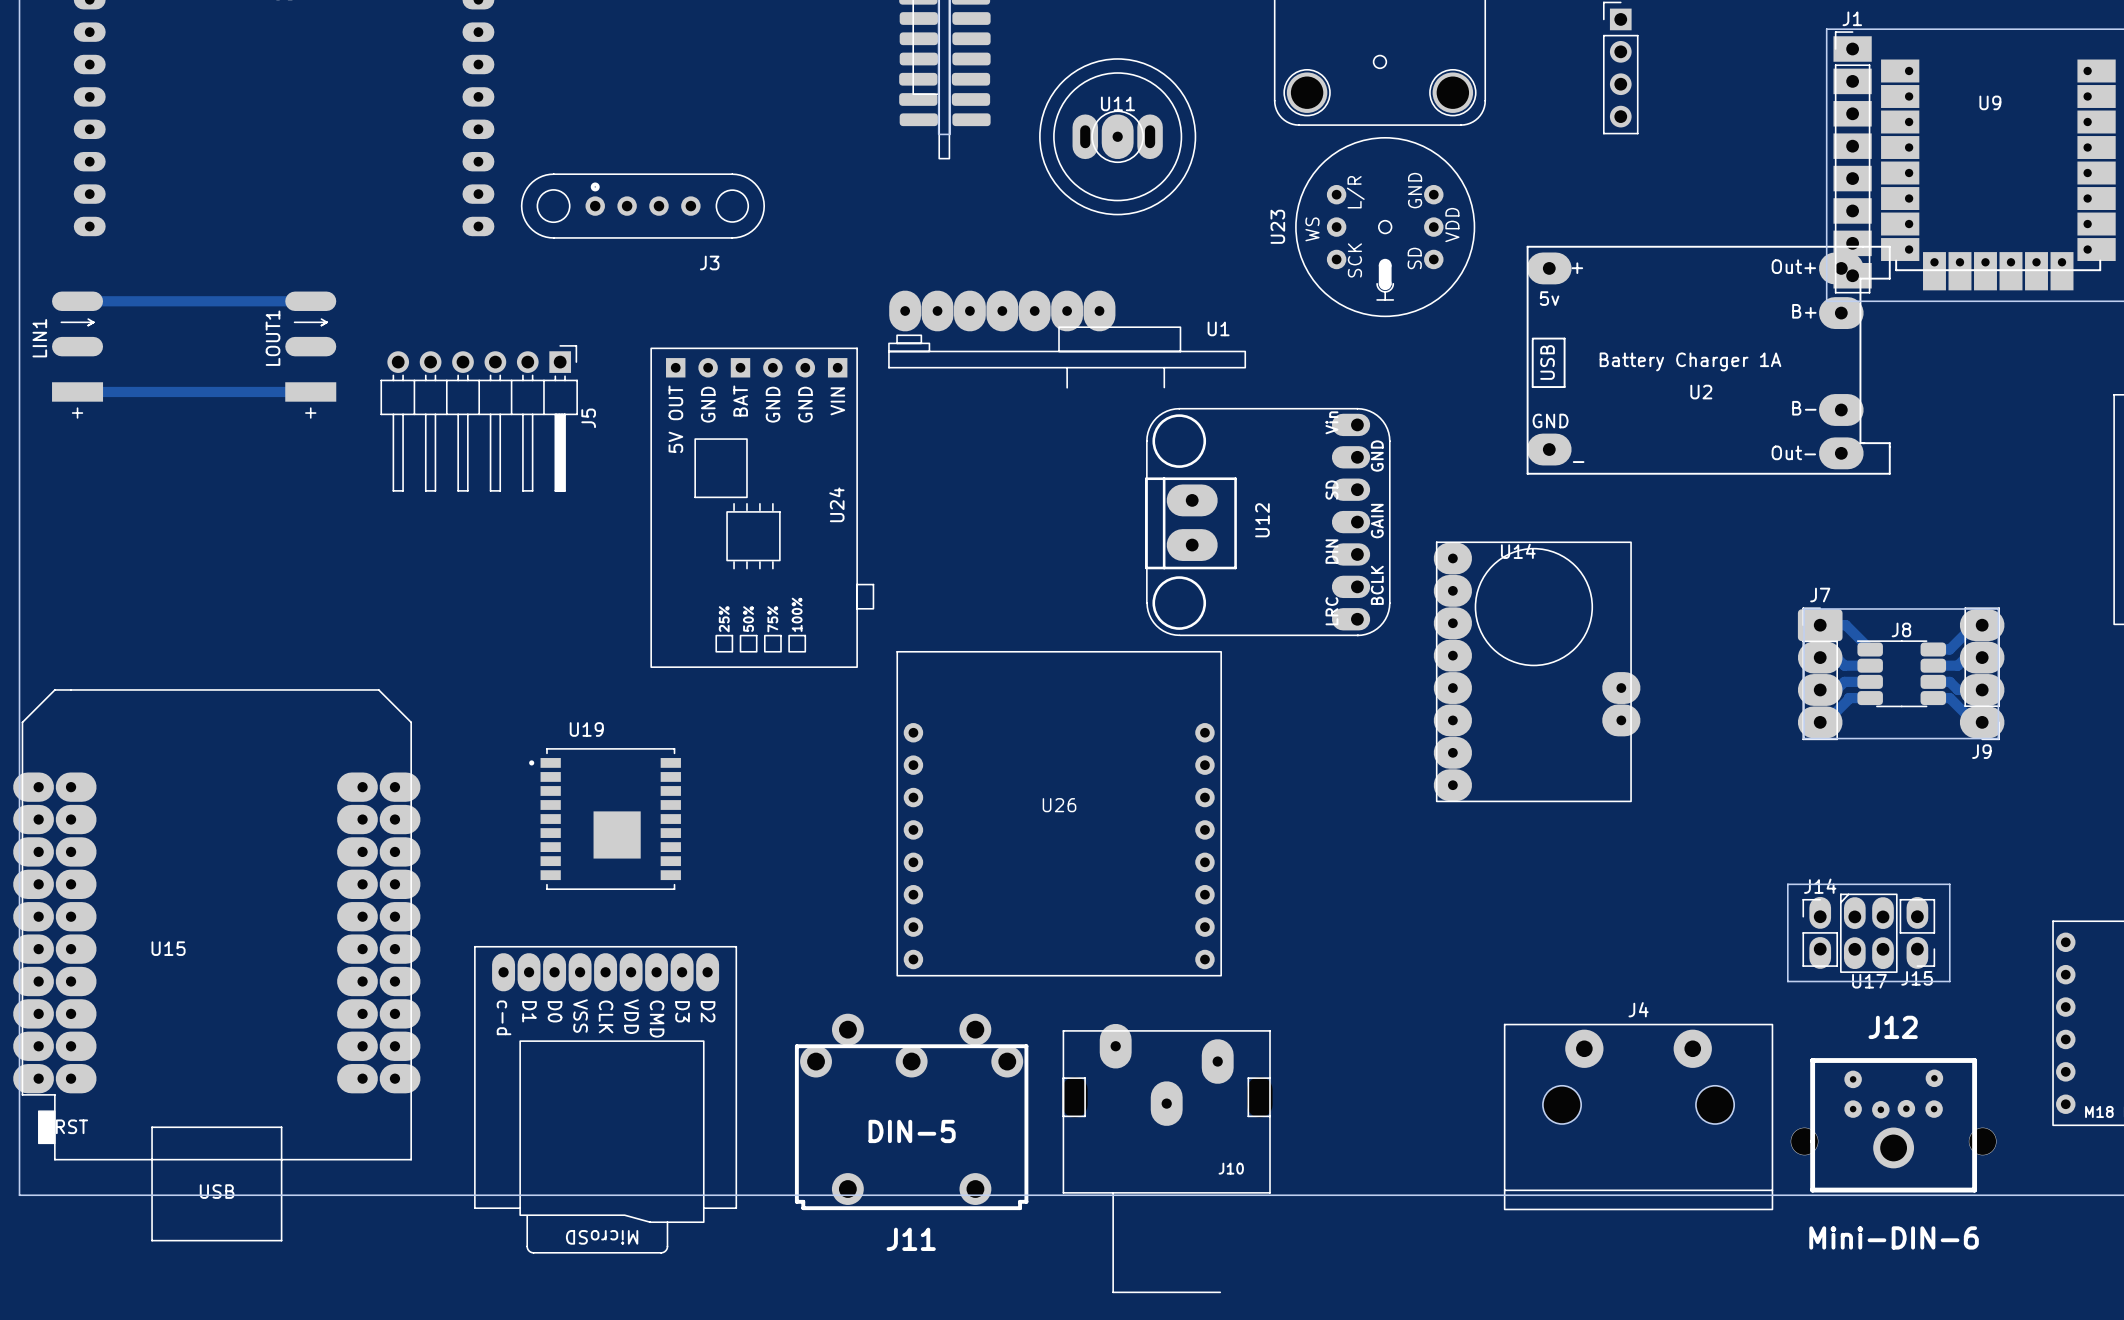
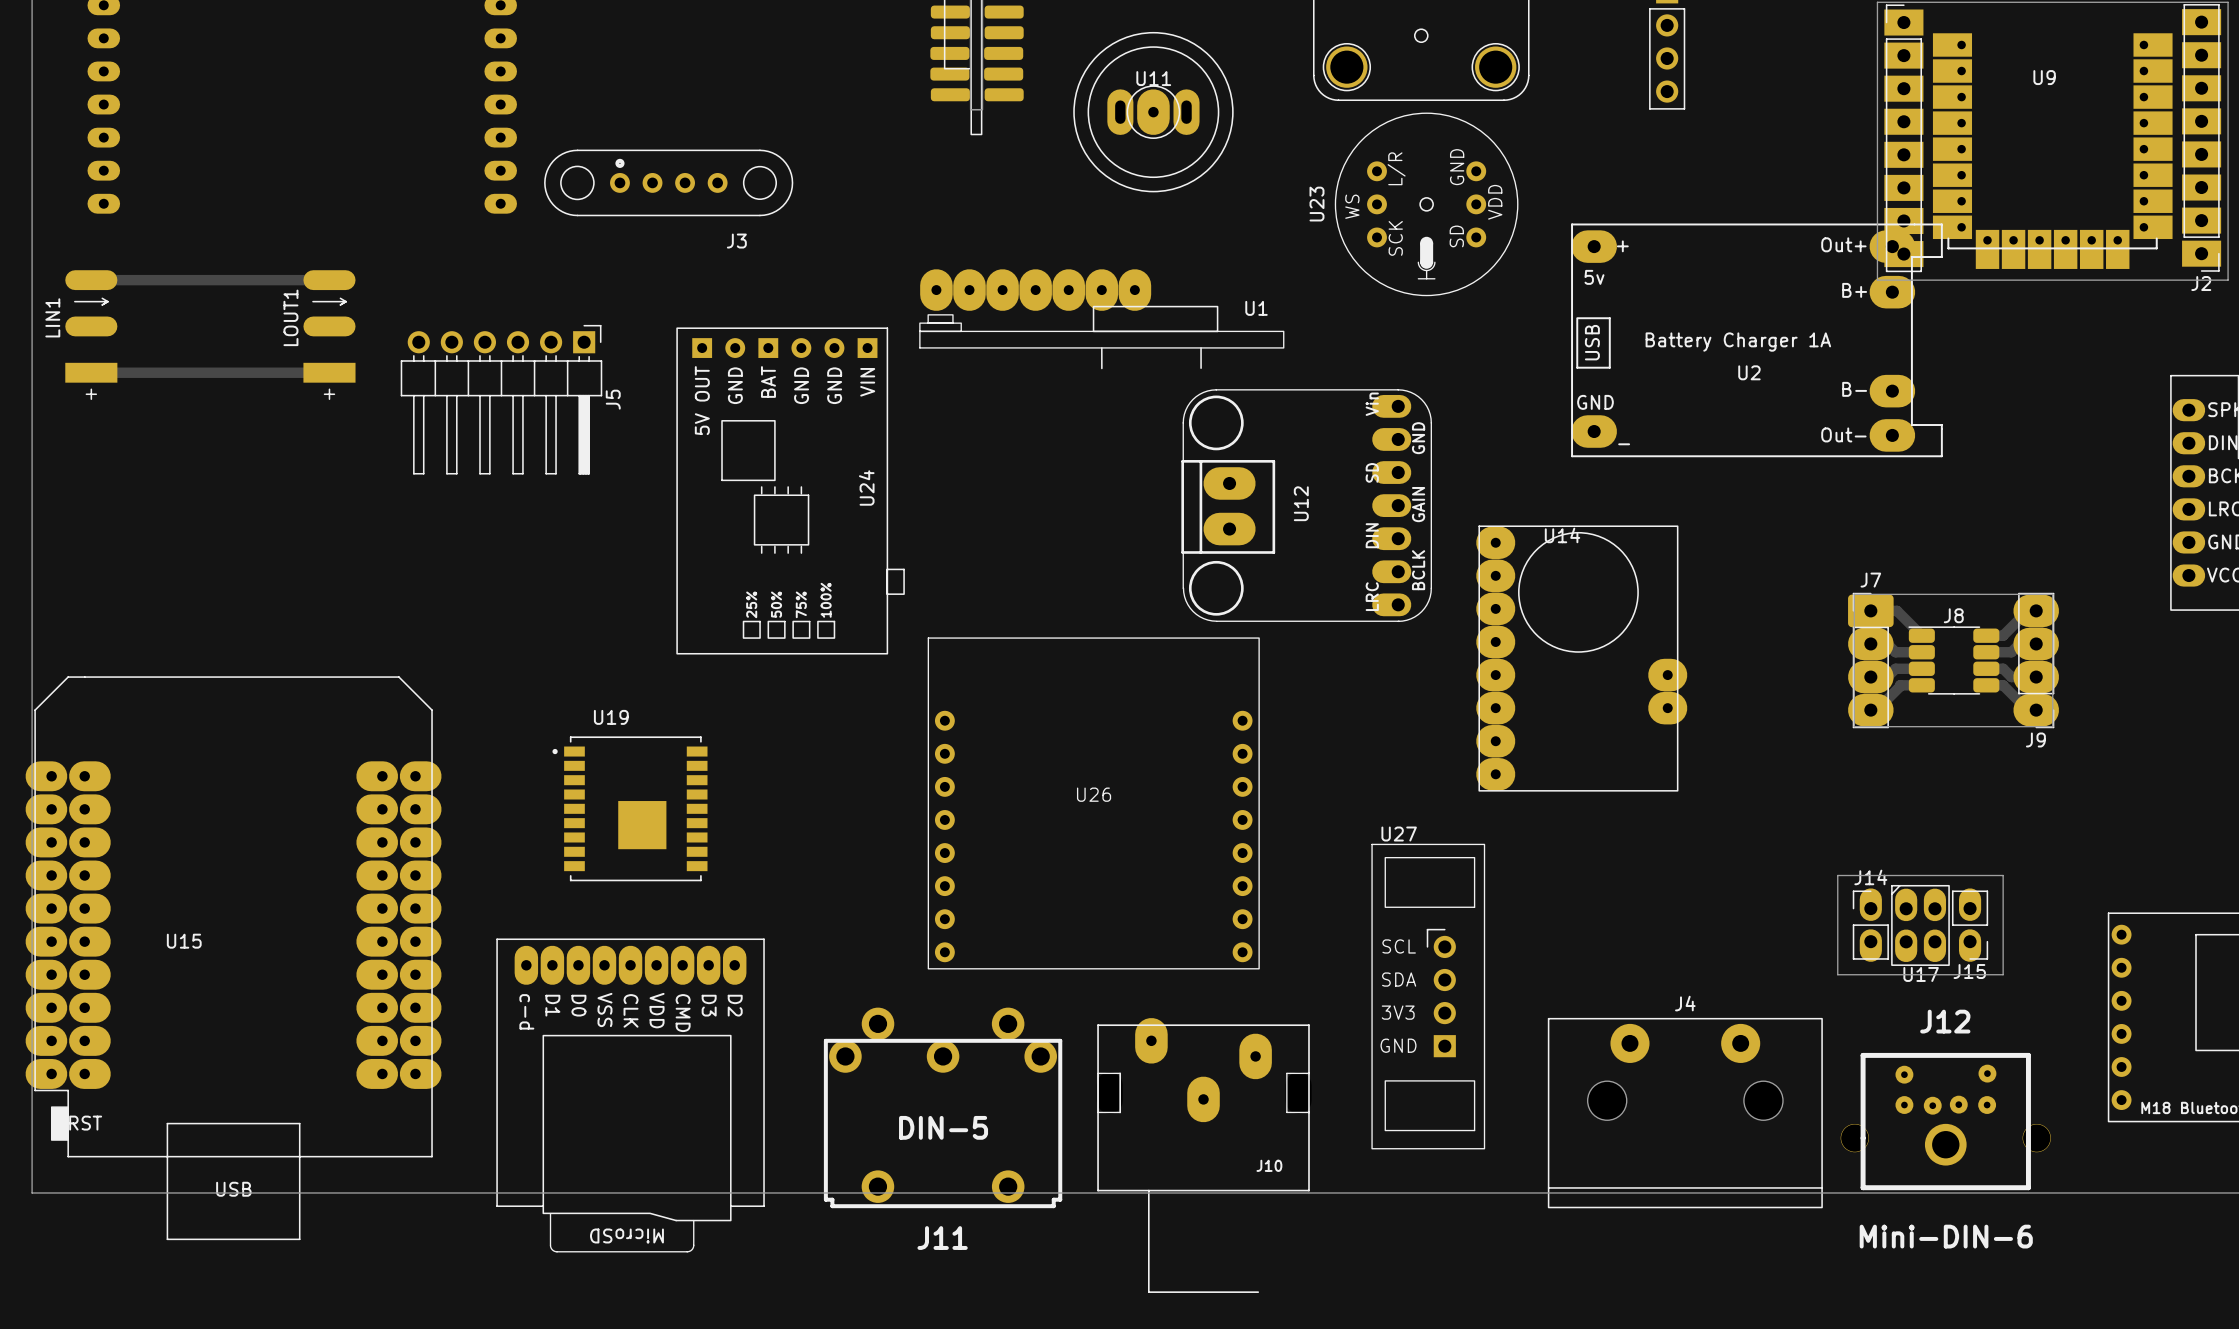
U27: none -> (1428, 996)

